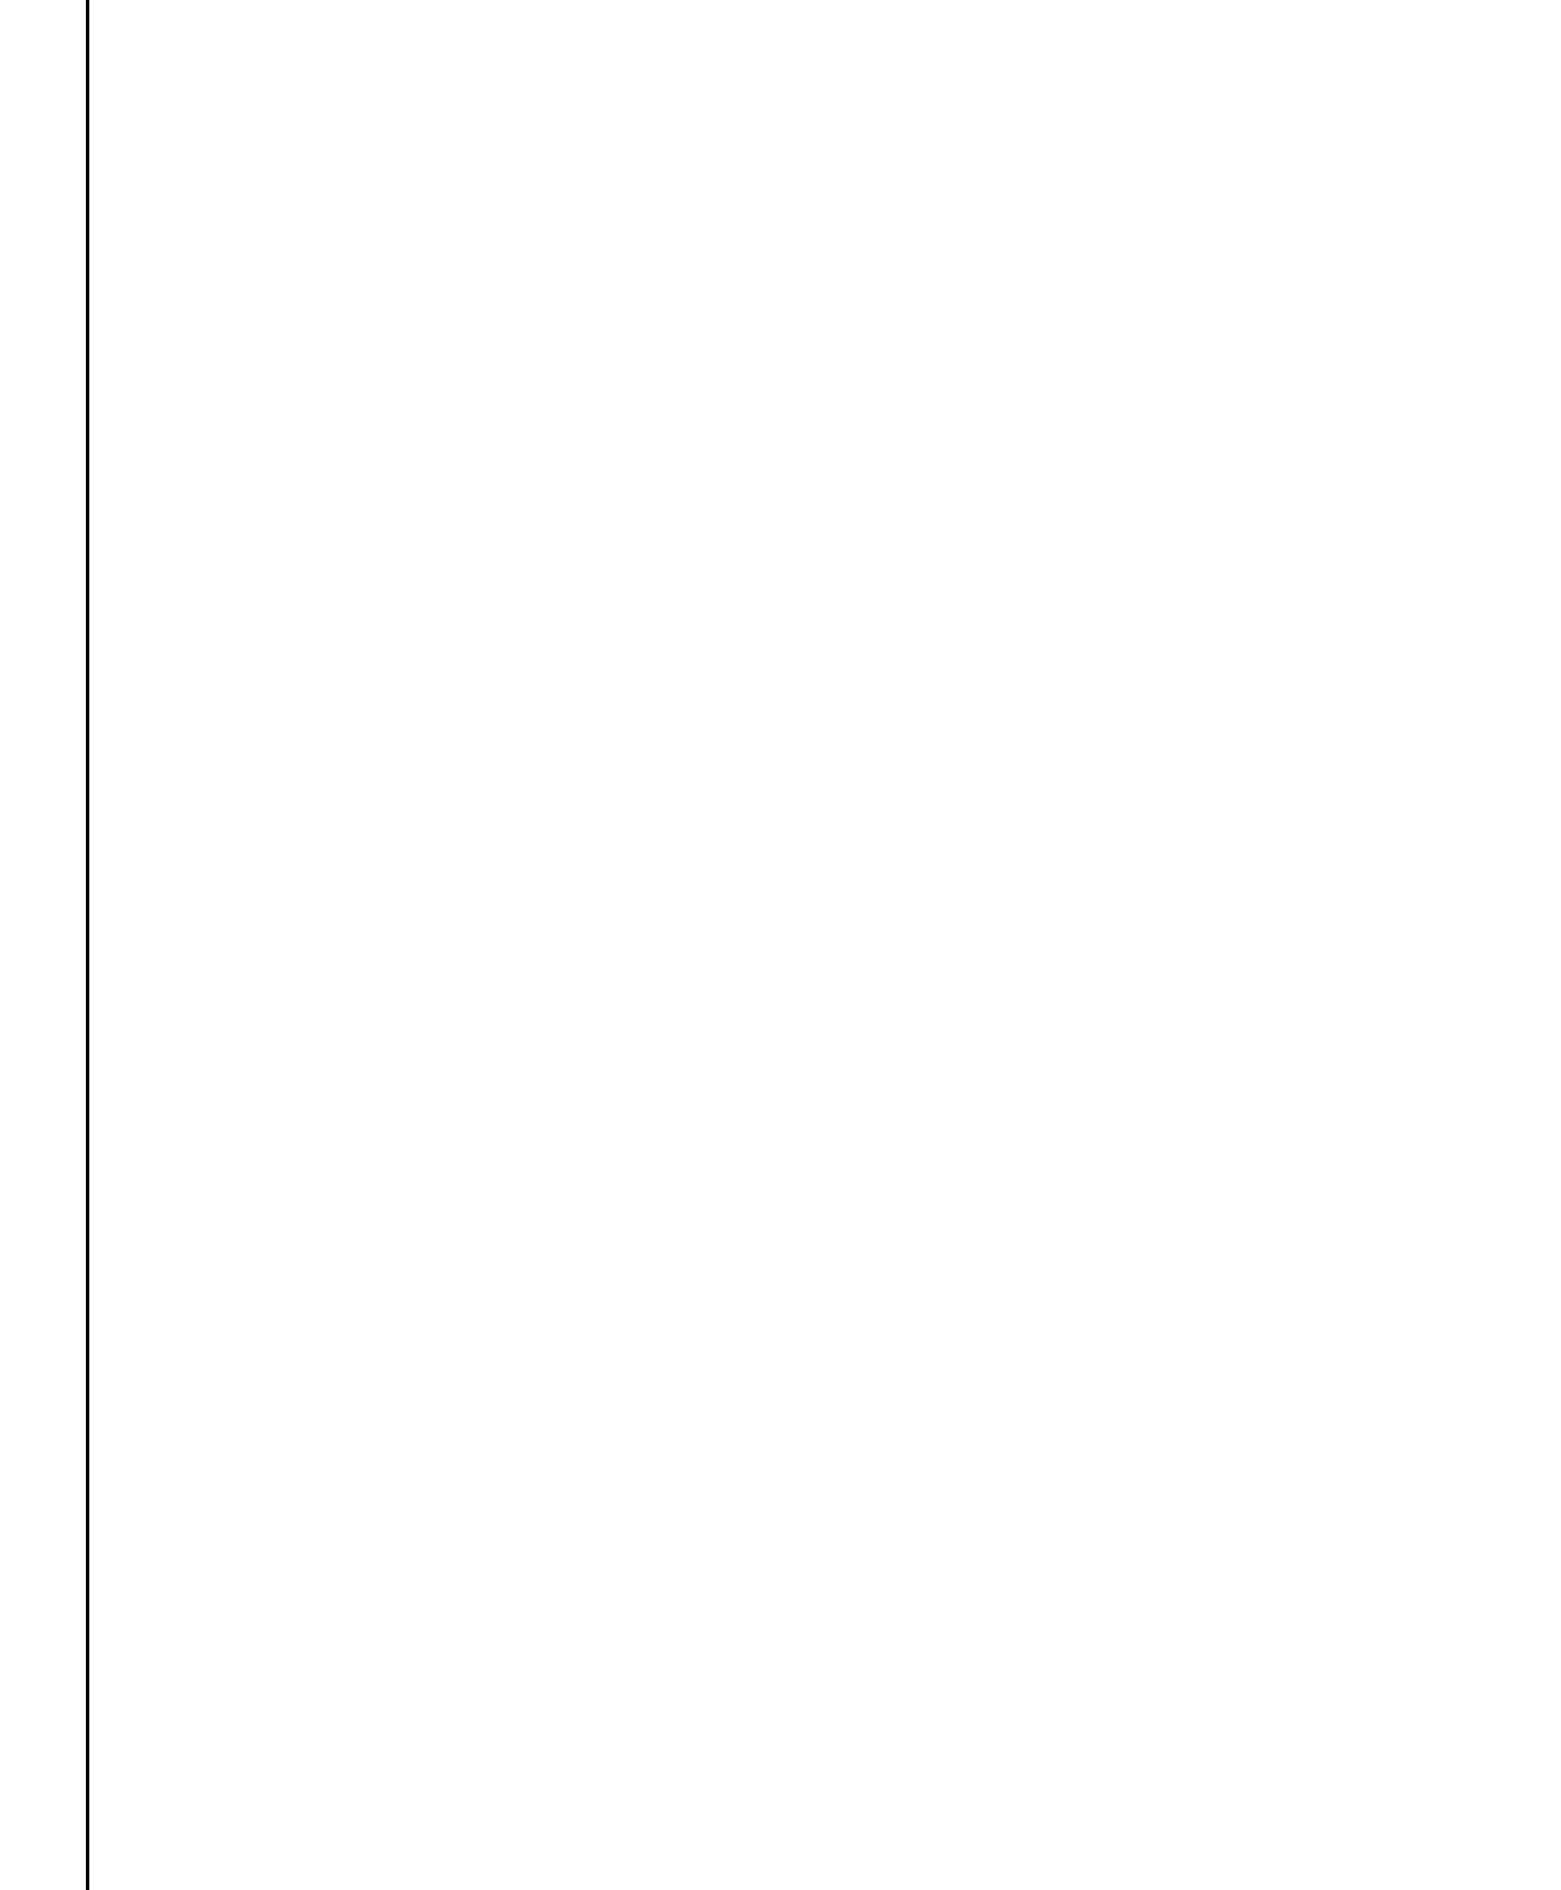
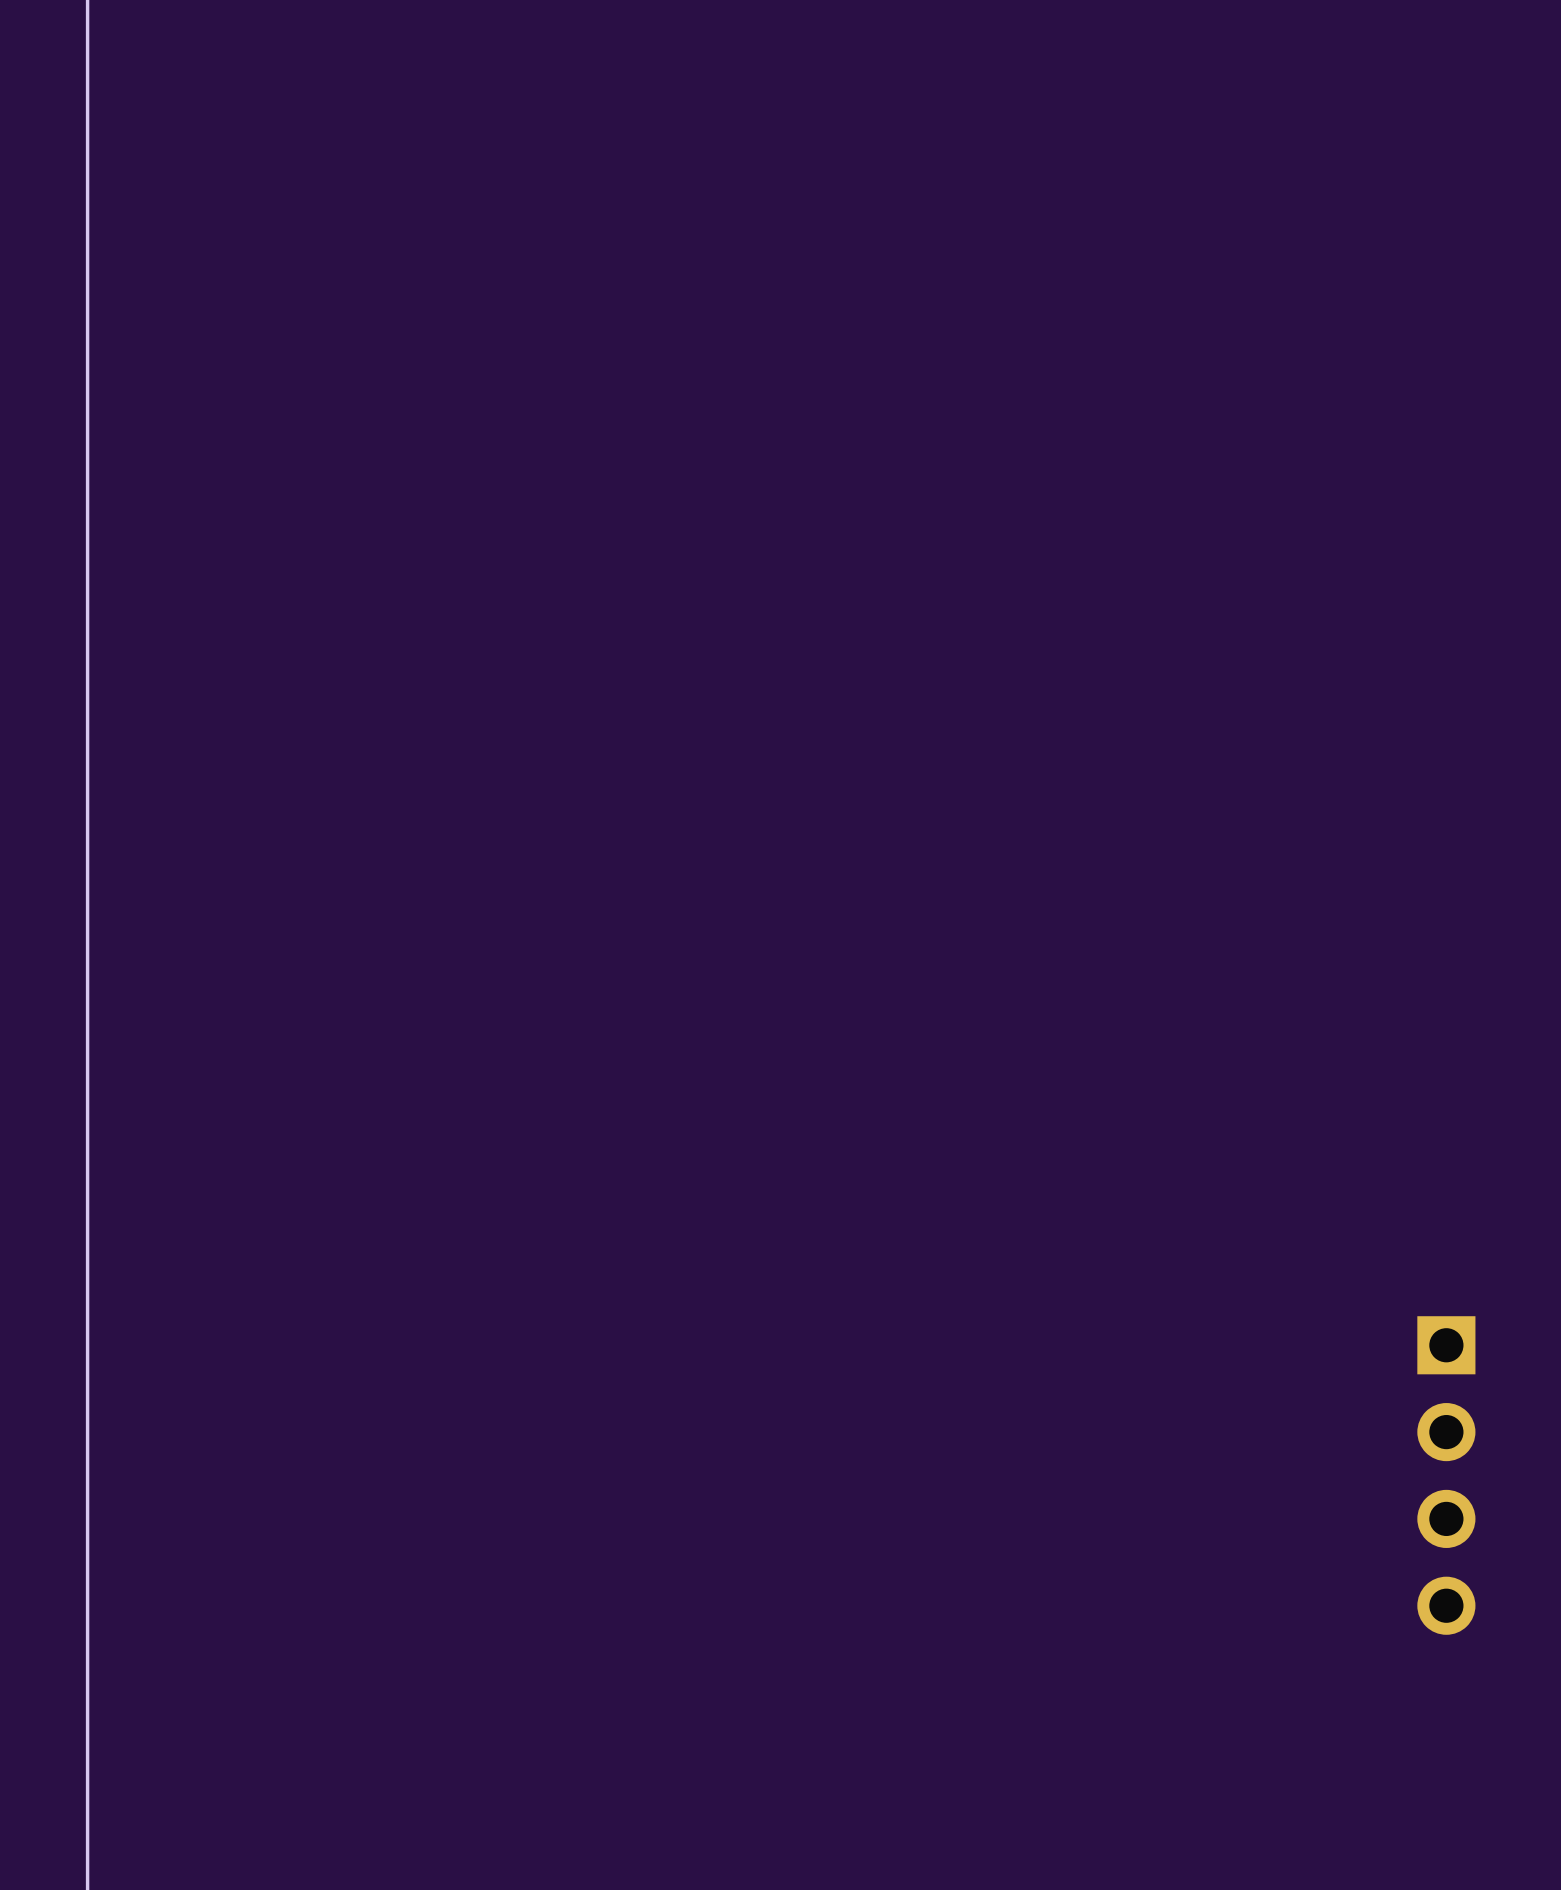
part: none -> (1446, 1475)

